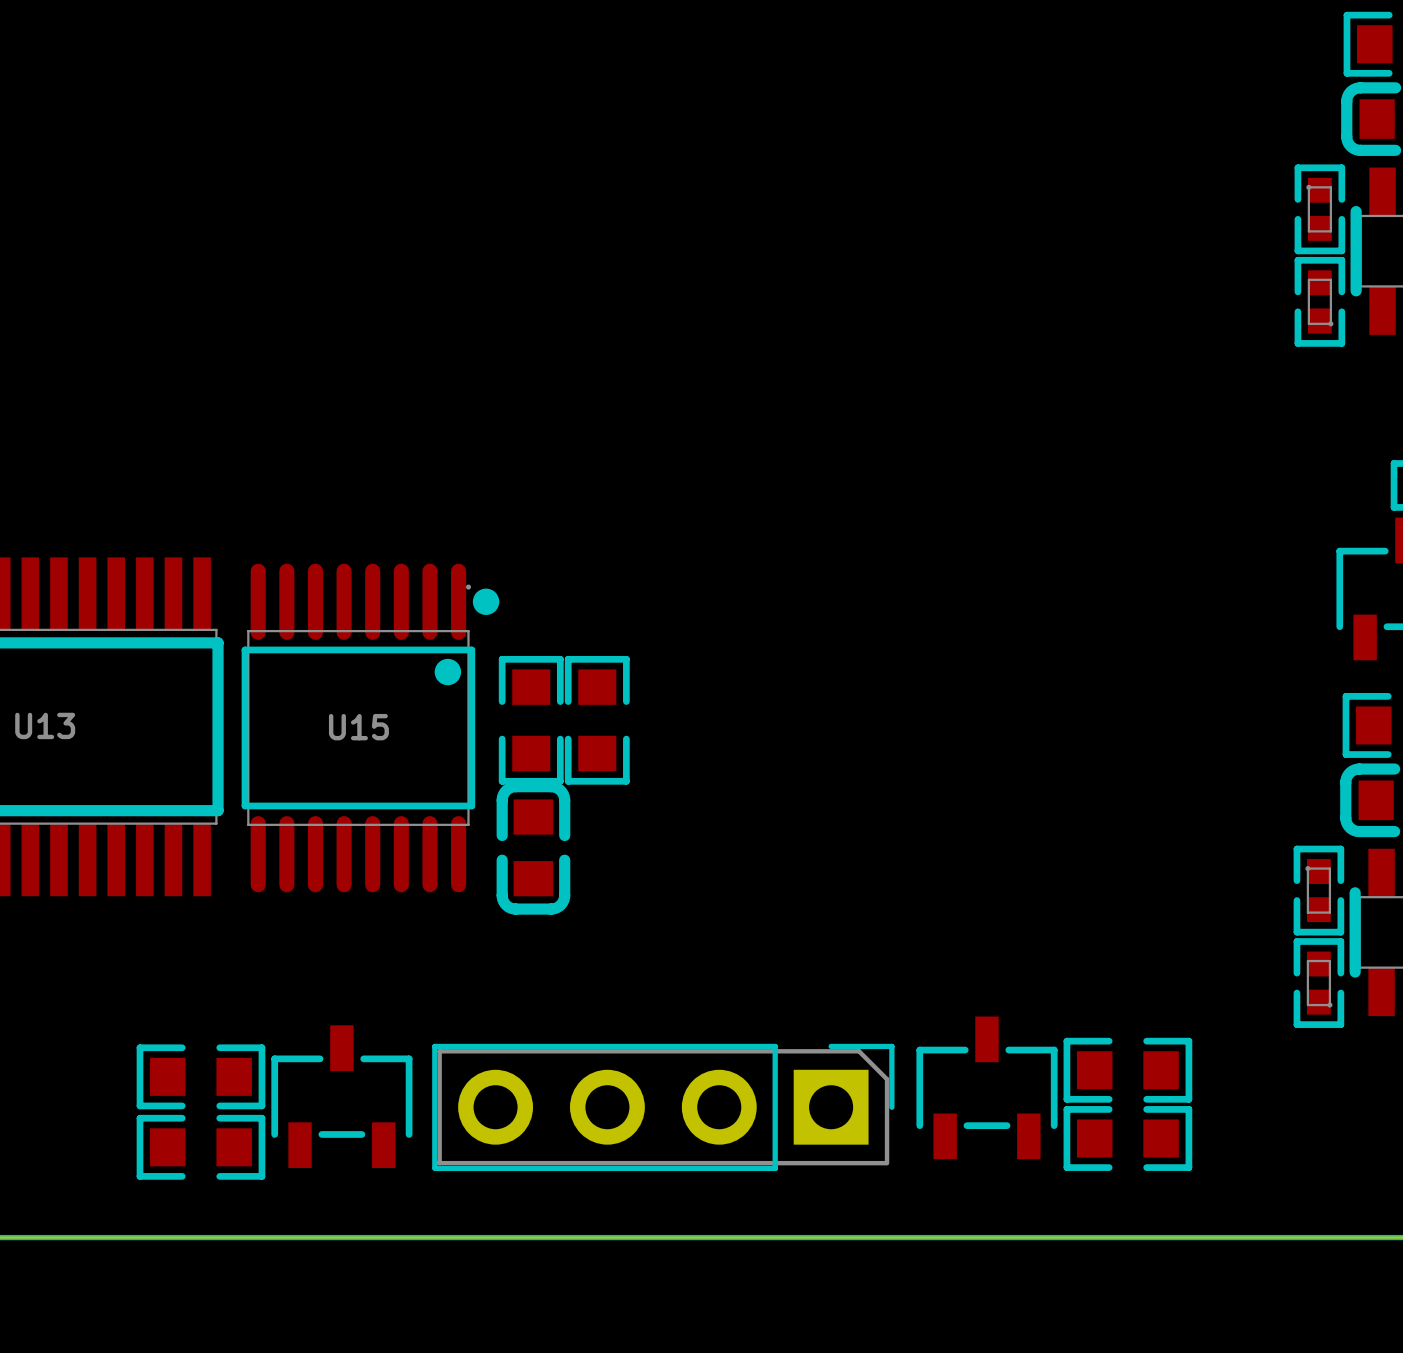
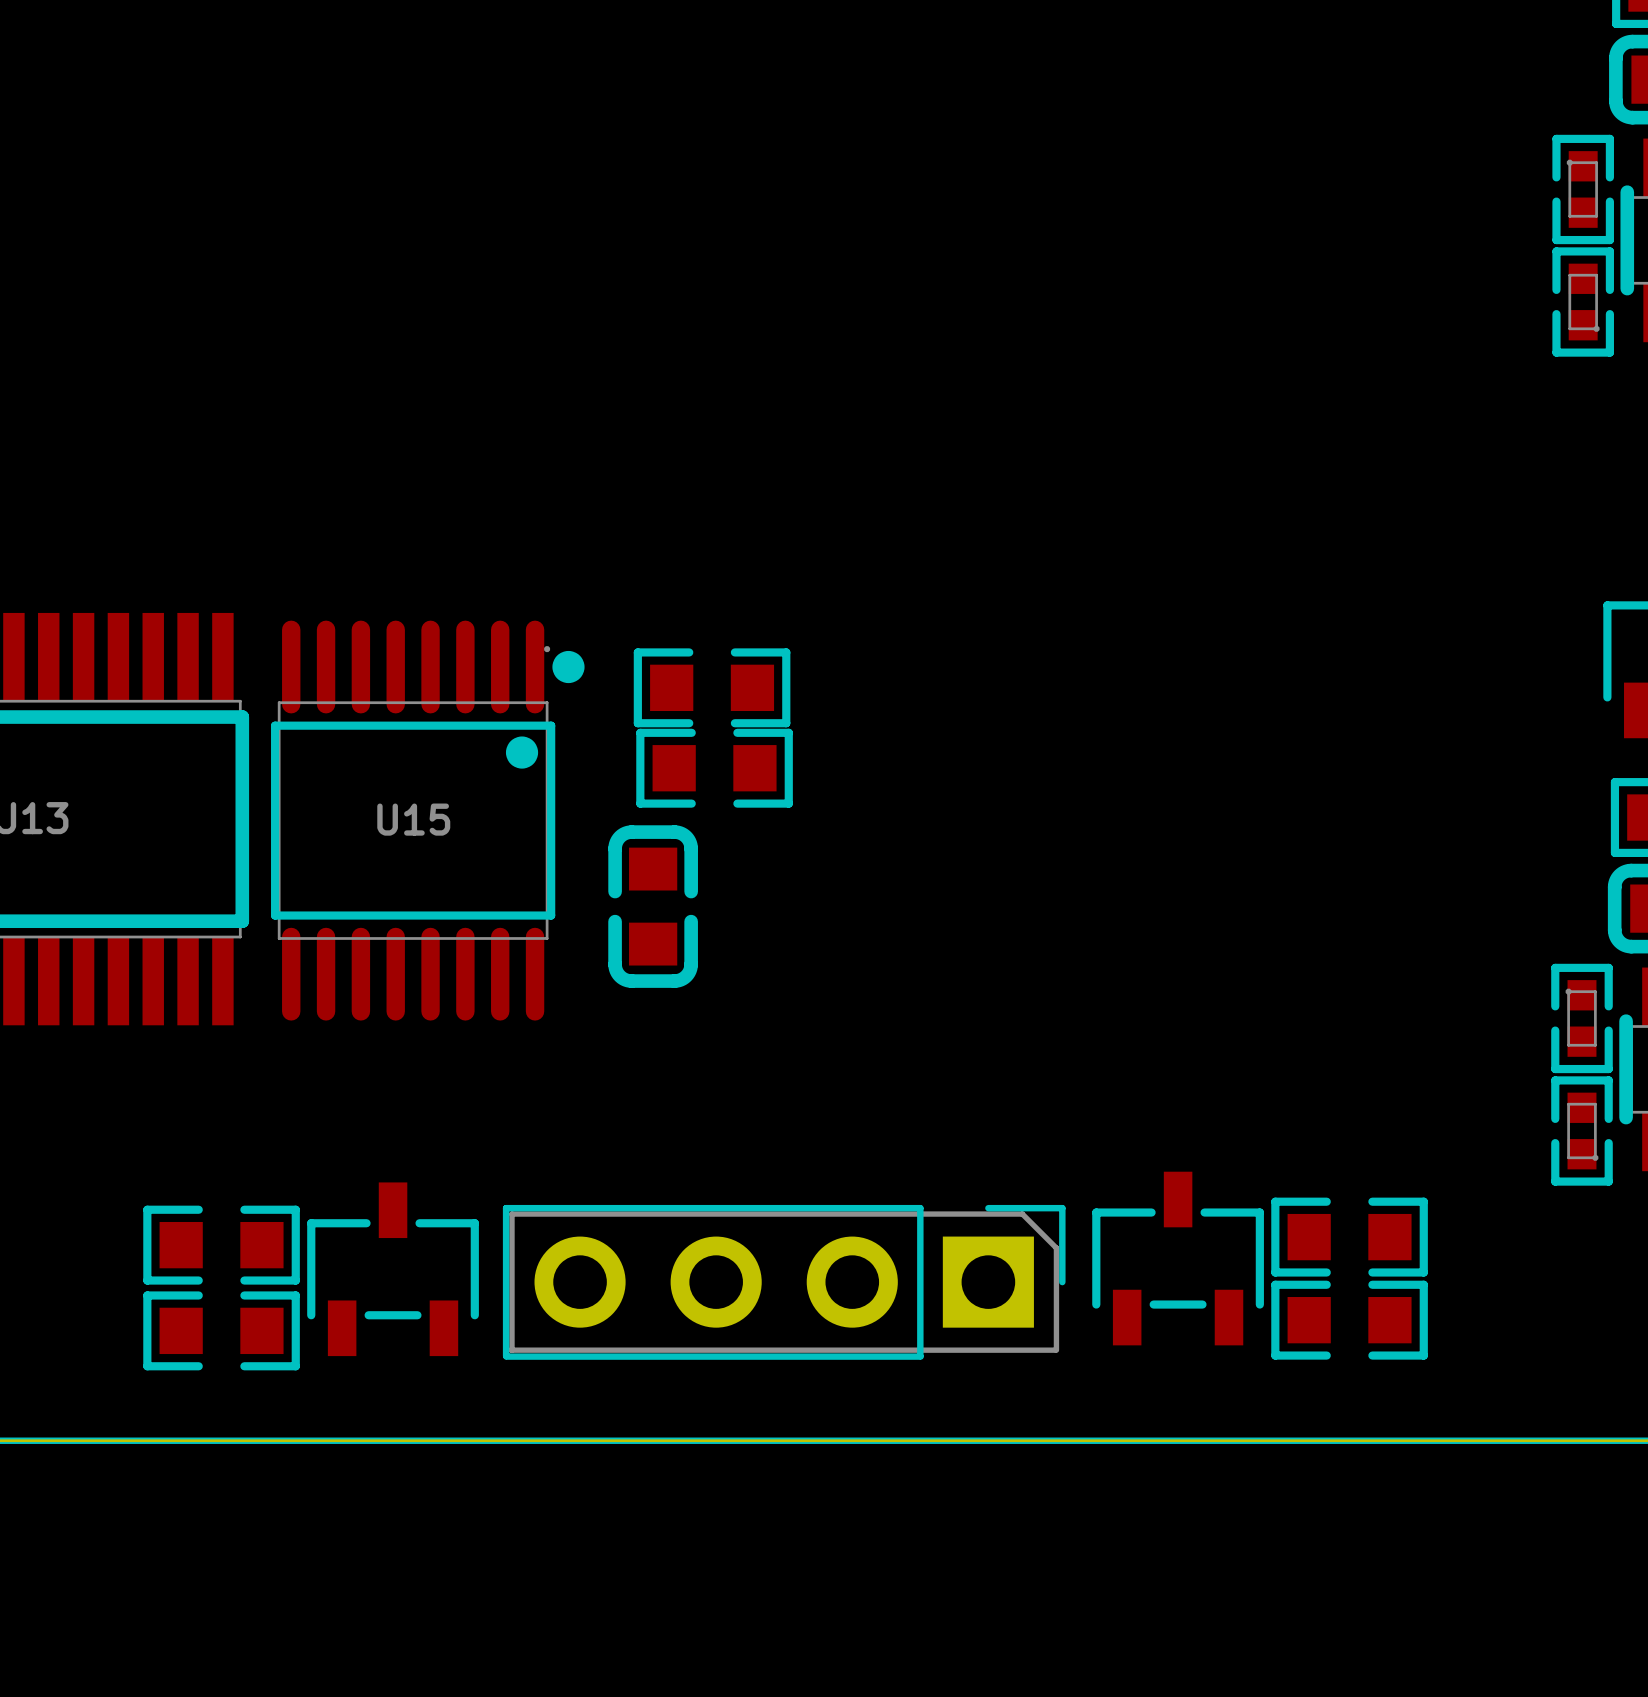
part rotation: 0° (531, 720) -> 90° clockwise (712, 687)
part position: (531, 720) -> (712, 687)
part rotation: 0° (597, 720) -> 90° clockwise (714, 768)
part rotation: 0° (533, 847) -> 180° (653, 906)

